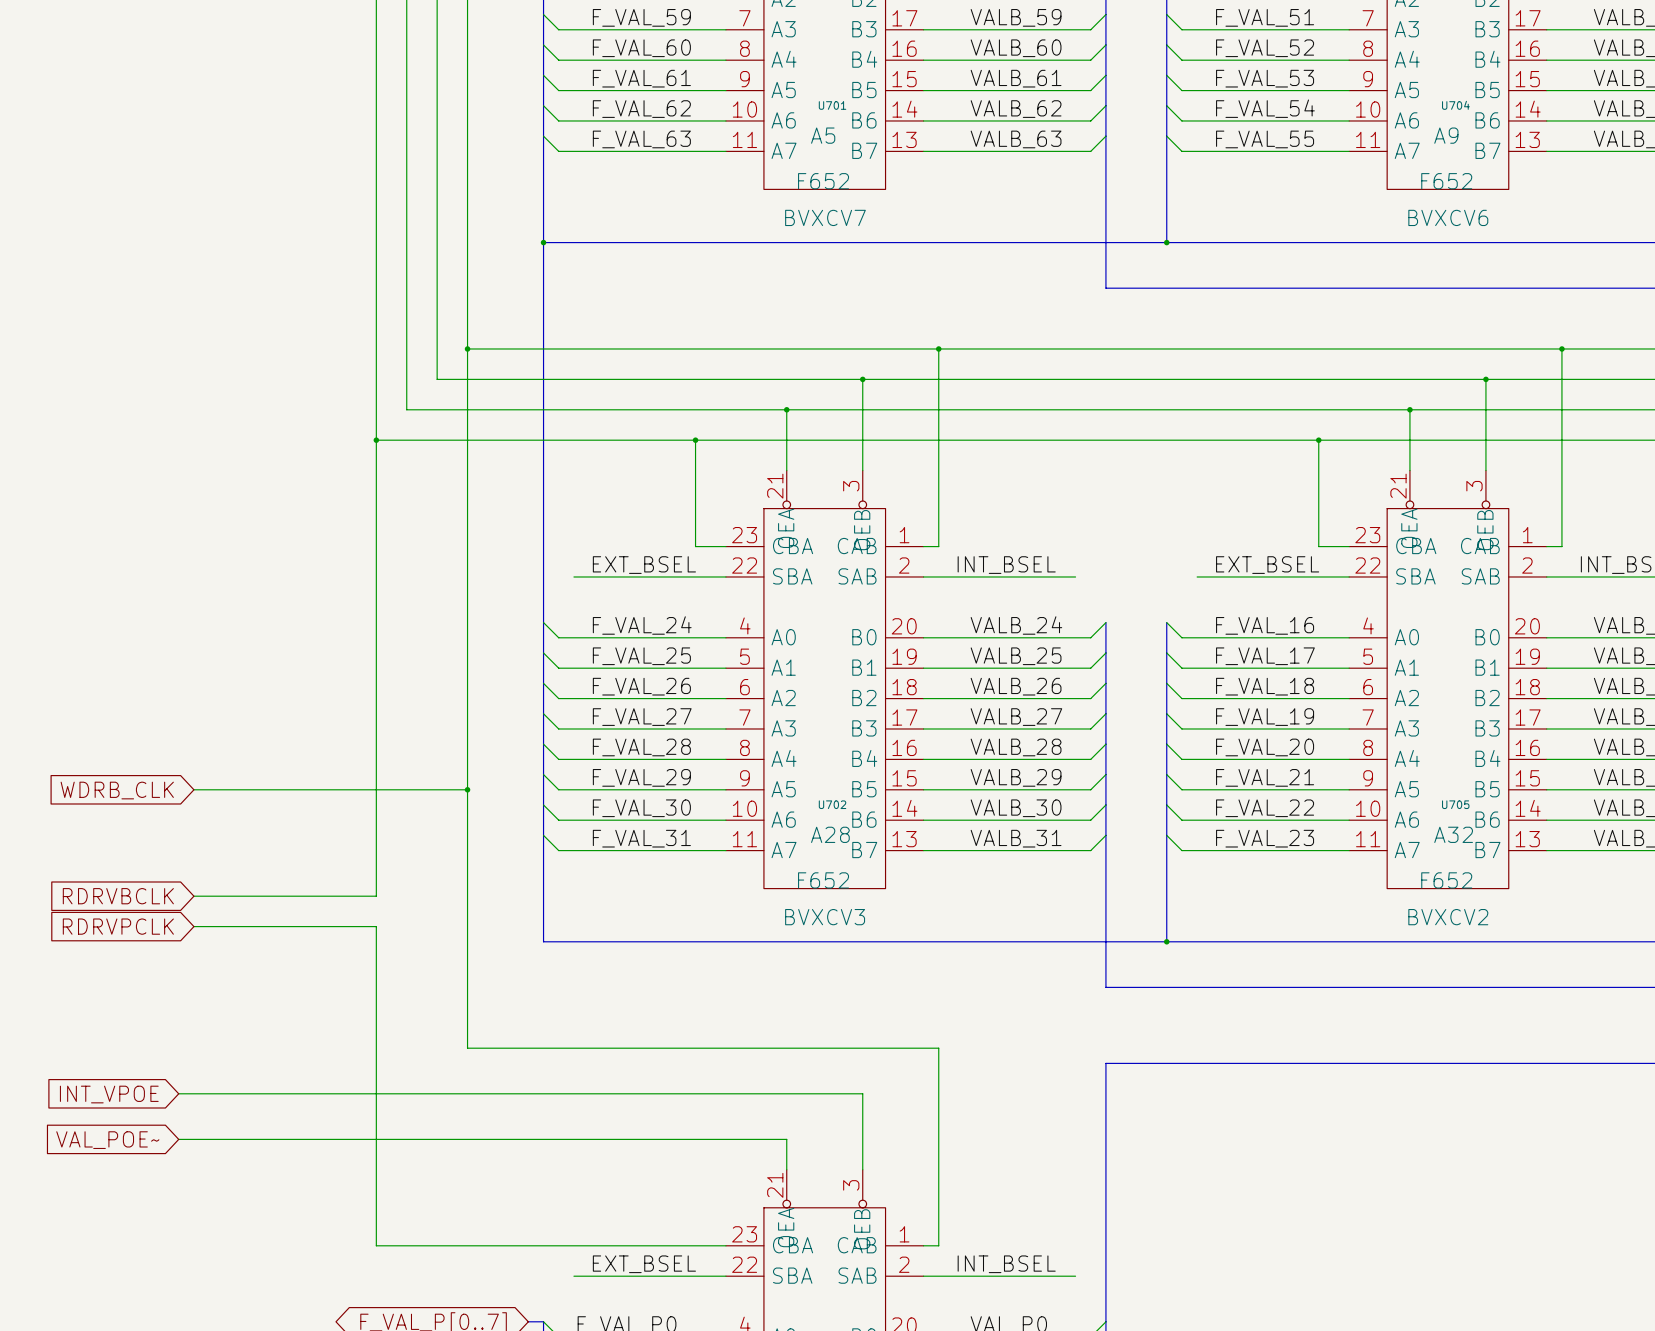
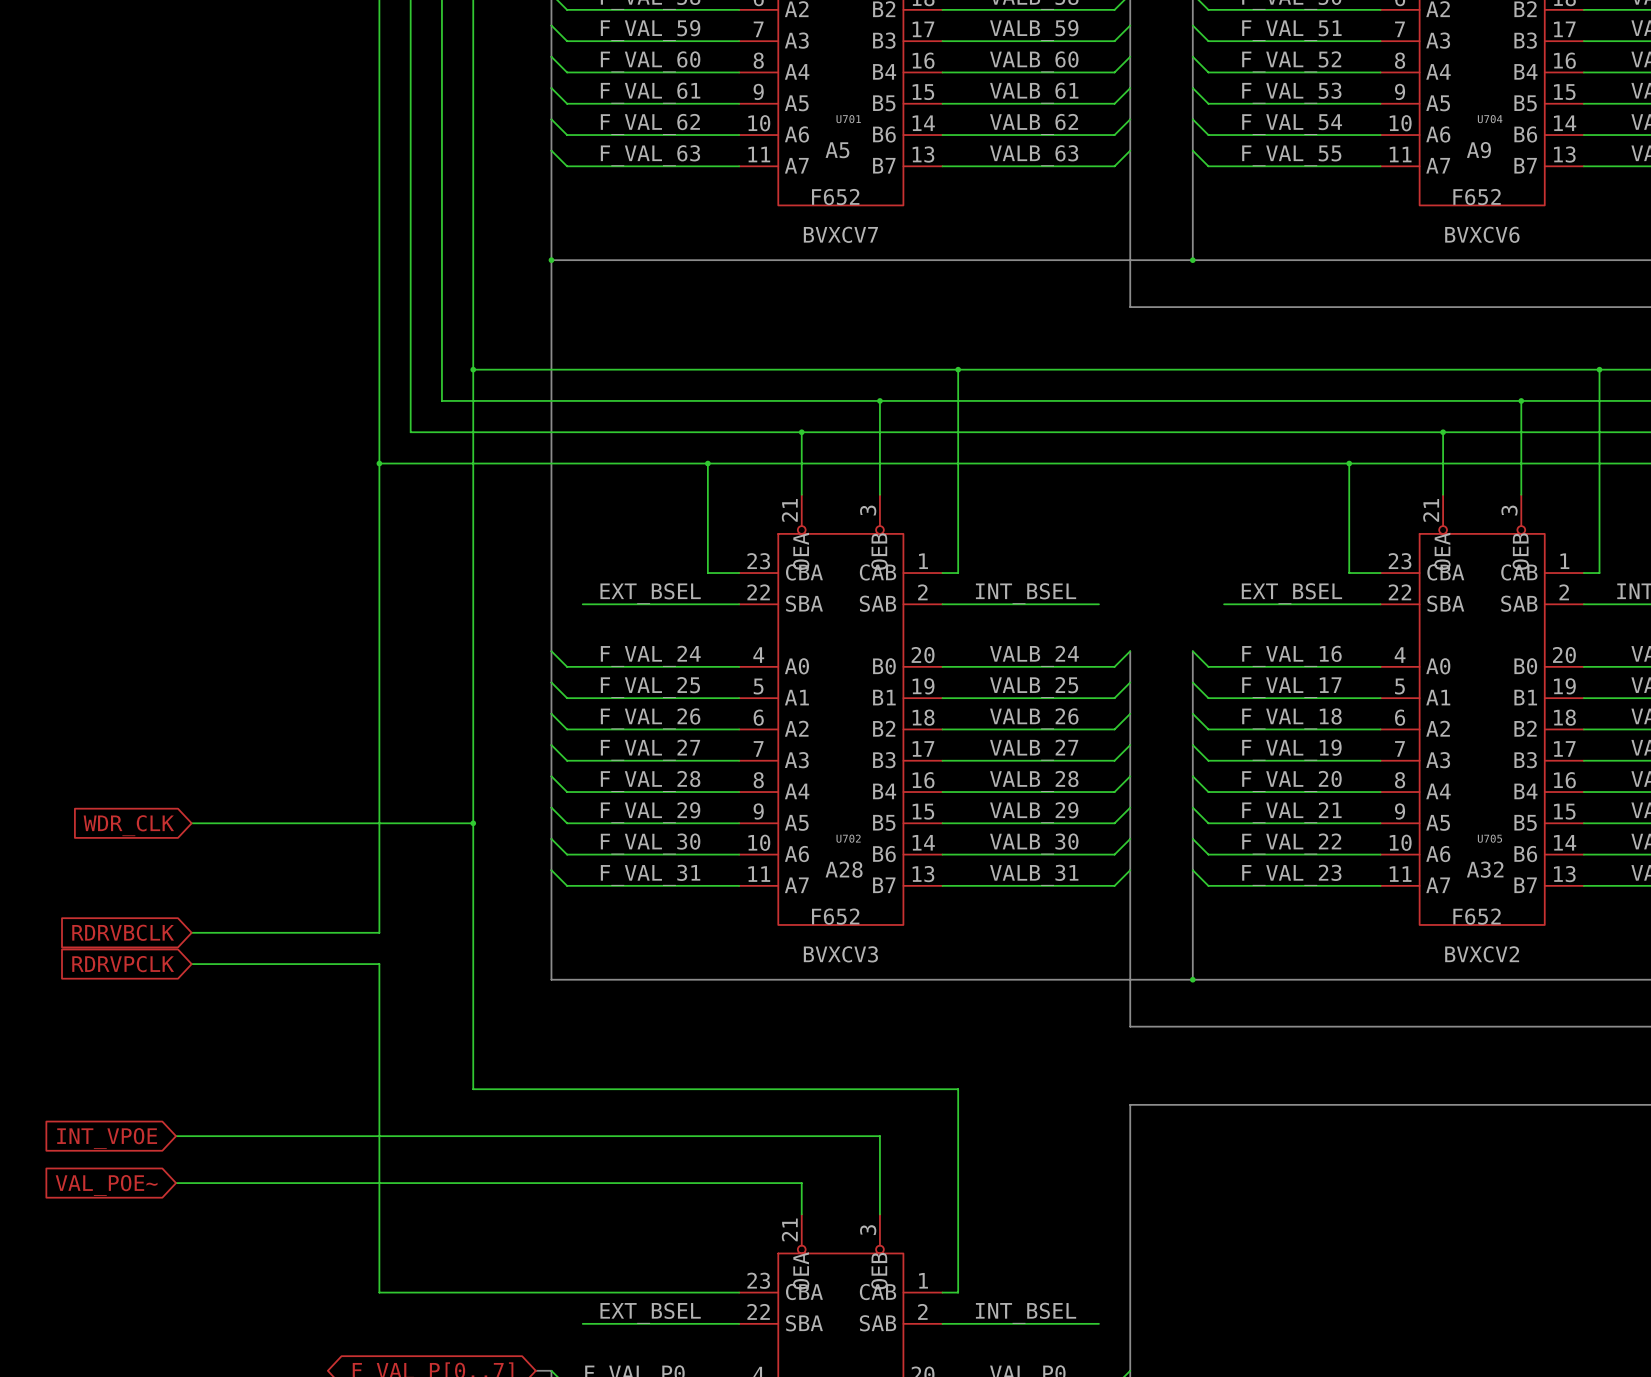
global label: WDRB_CLK (117, 790) -> WDR_CLK (128, 825)

